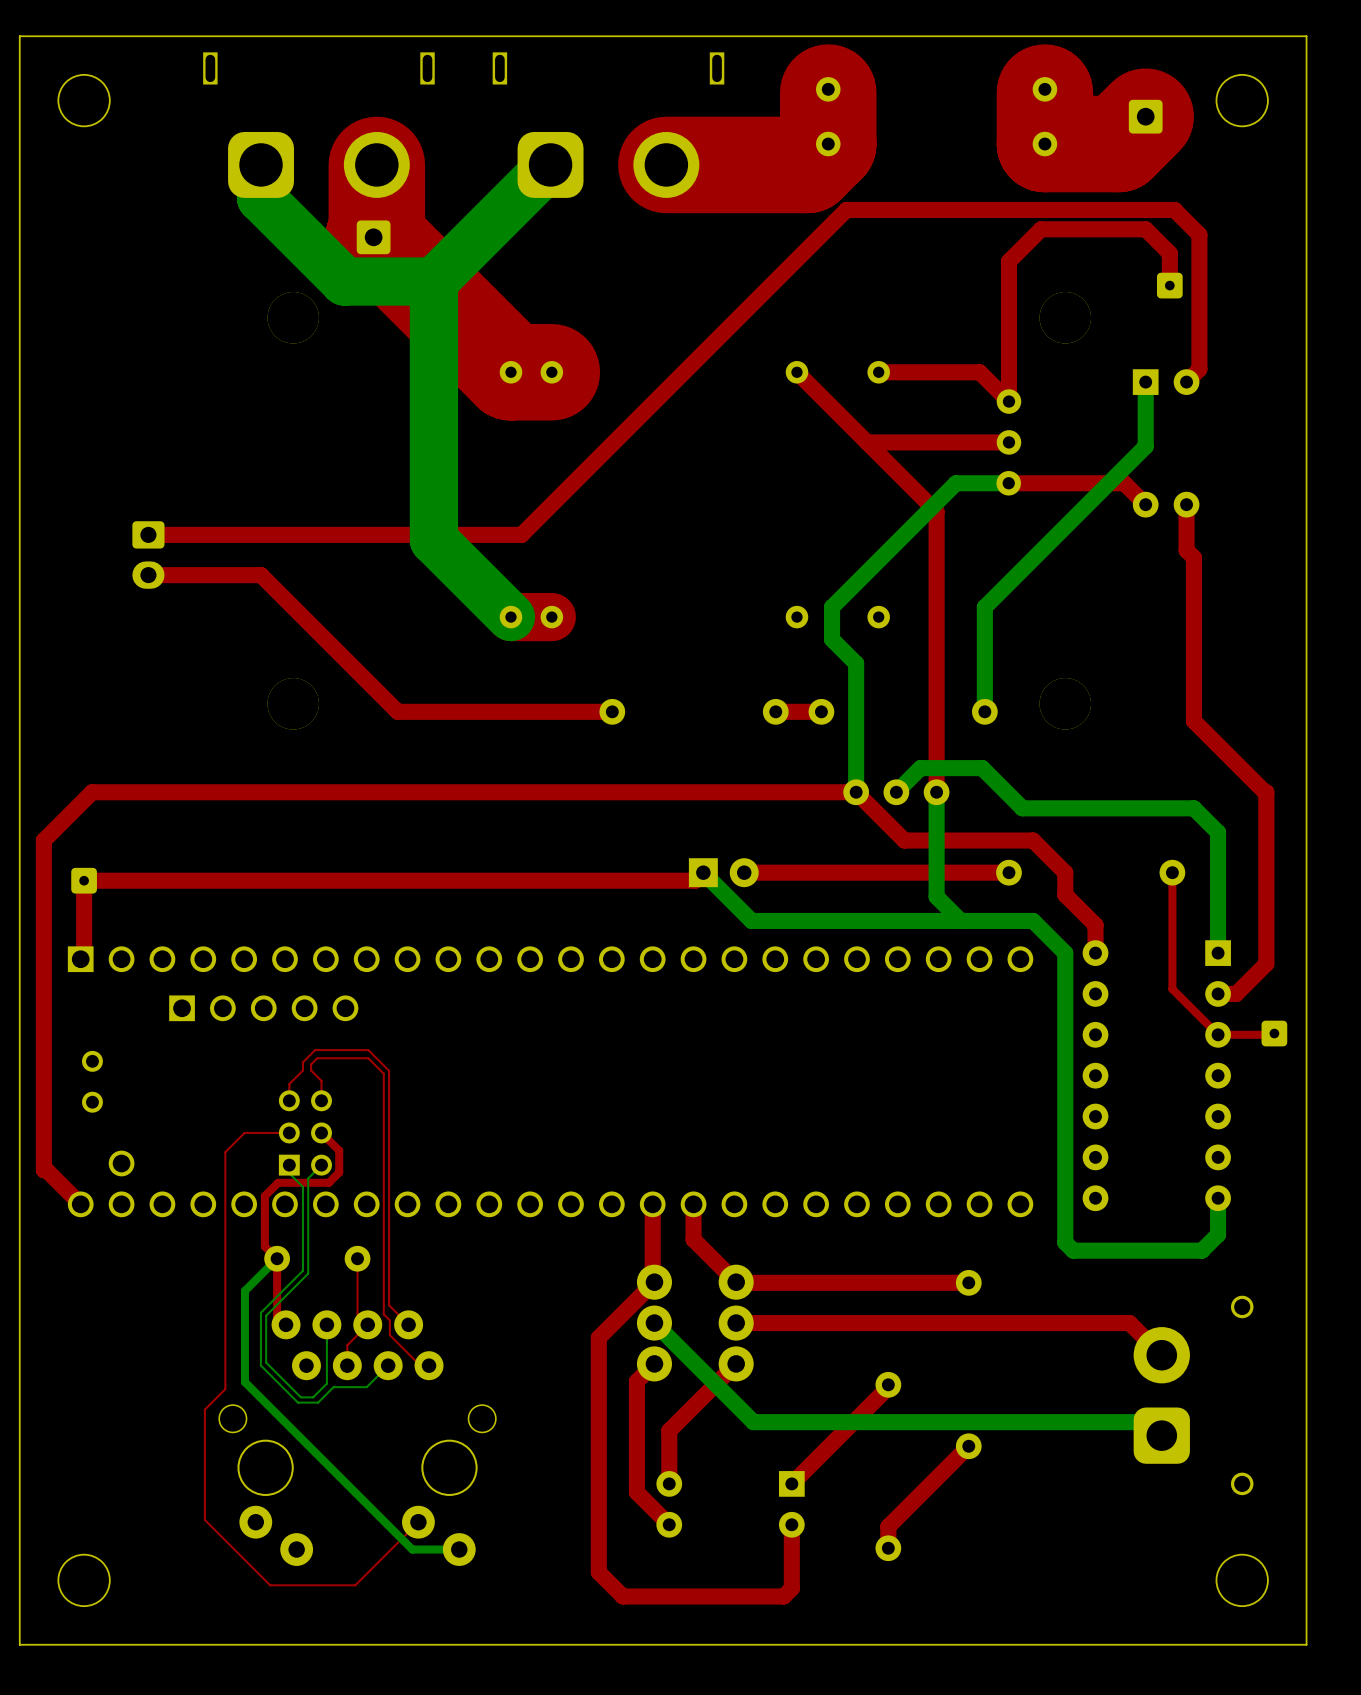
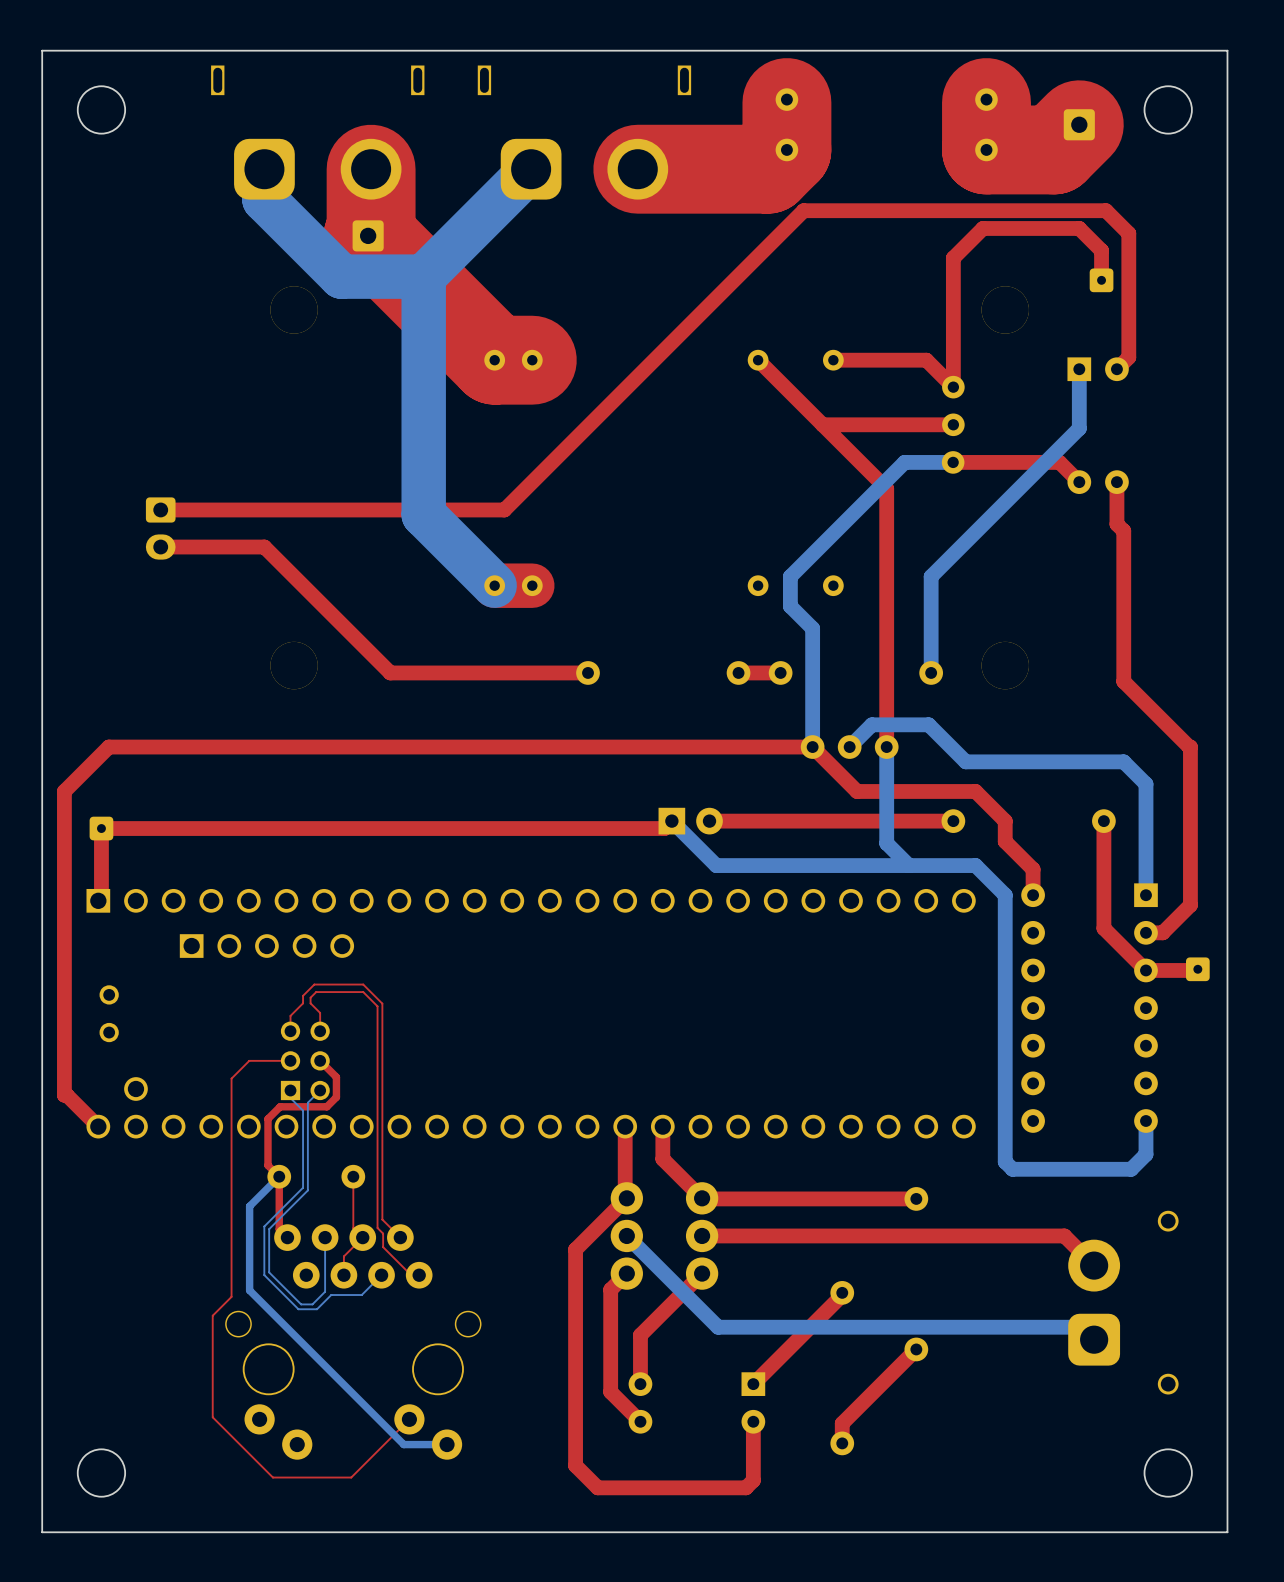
top track width: thin (1172, 872) (1172, 989) (1218, 1034) (1274, 1033) -> thick (1103, 821) (1103, 928) (1145, 970) (1197, 969)

